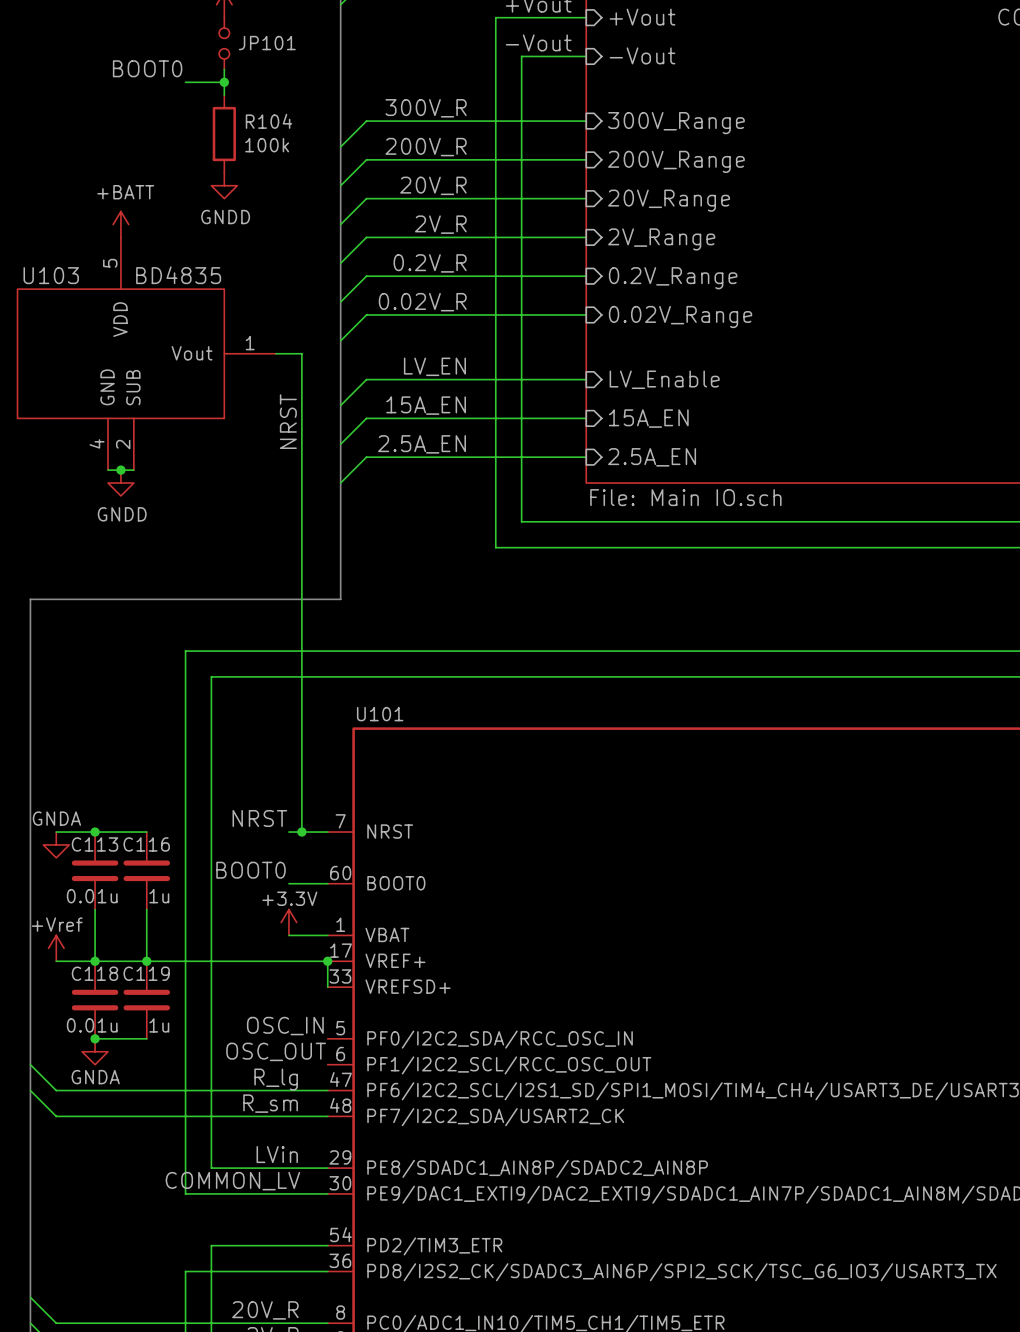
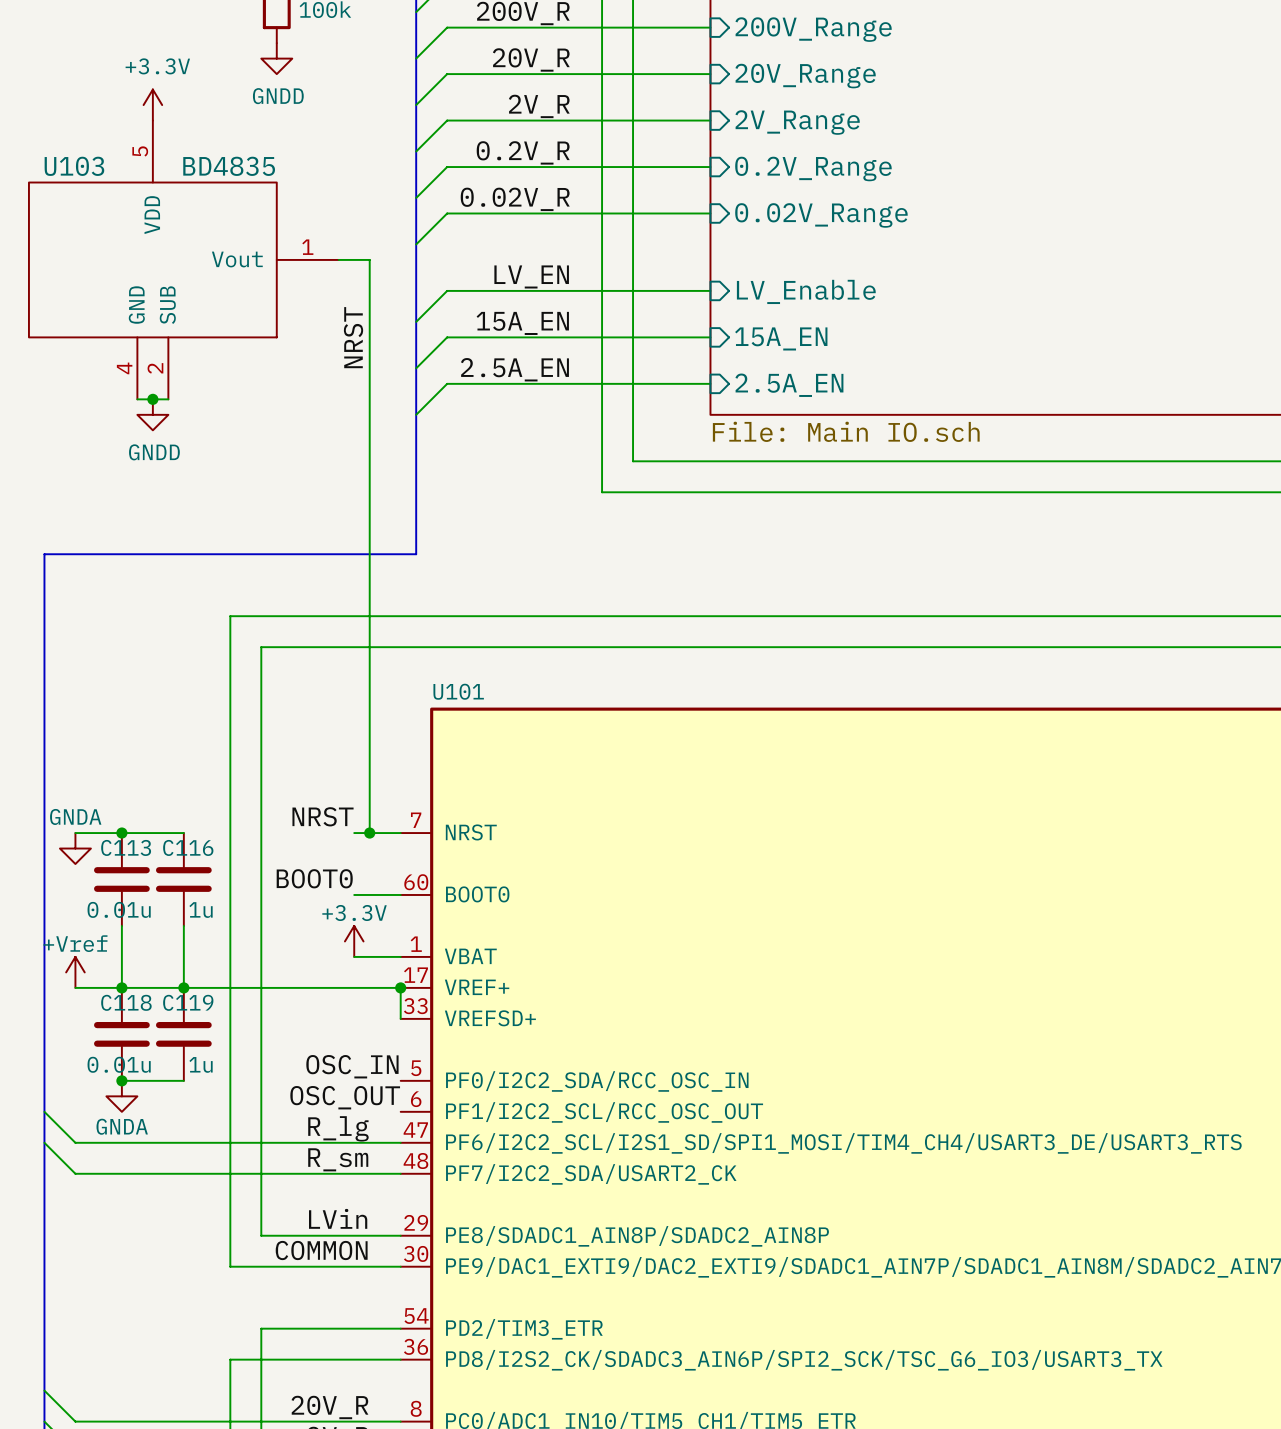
power symbol: +BATT (120, 224) -> +3.3V (152, 105)
label: COMMON_LV (232, 1181) -> COMMON (321, 1250)

